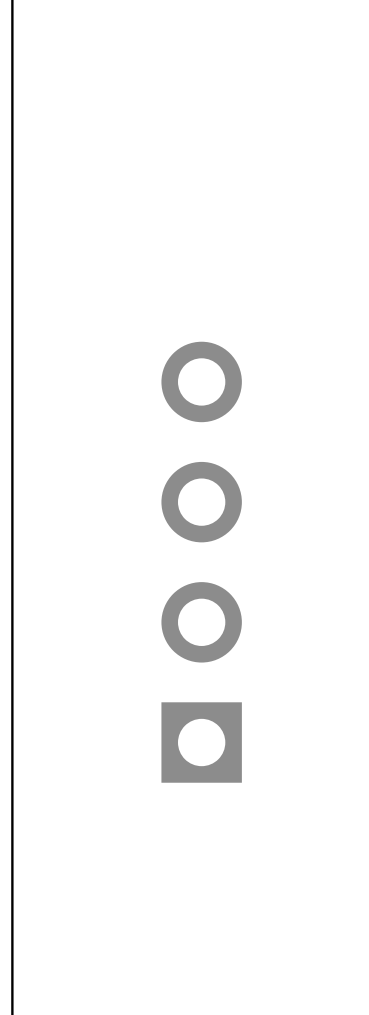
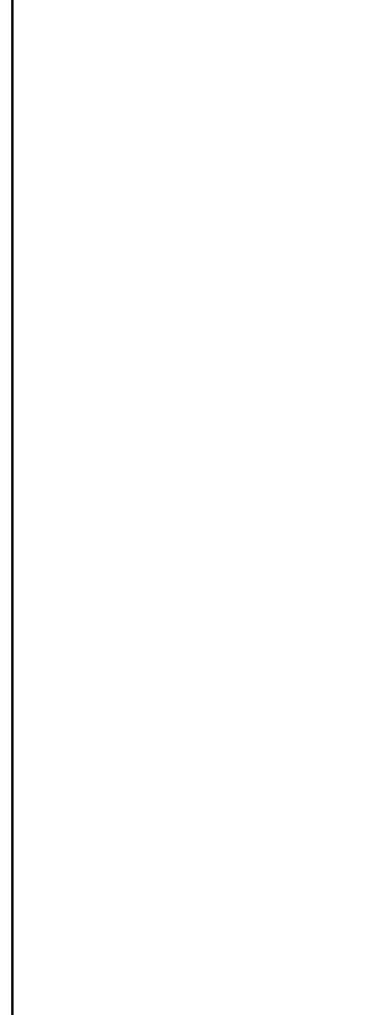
part: (201, 562) -> none

